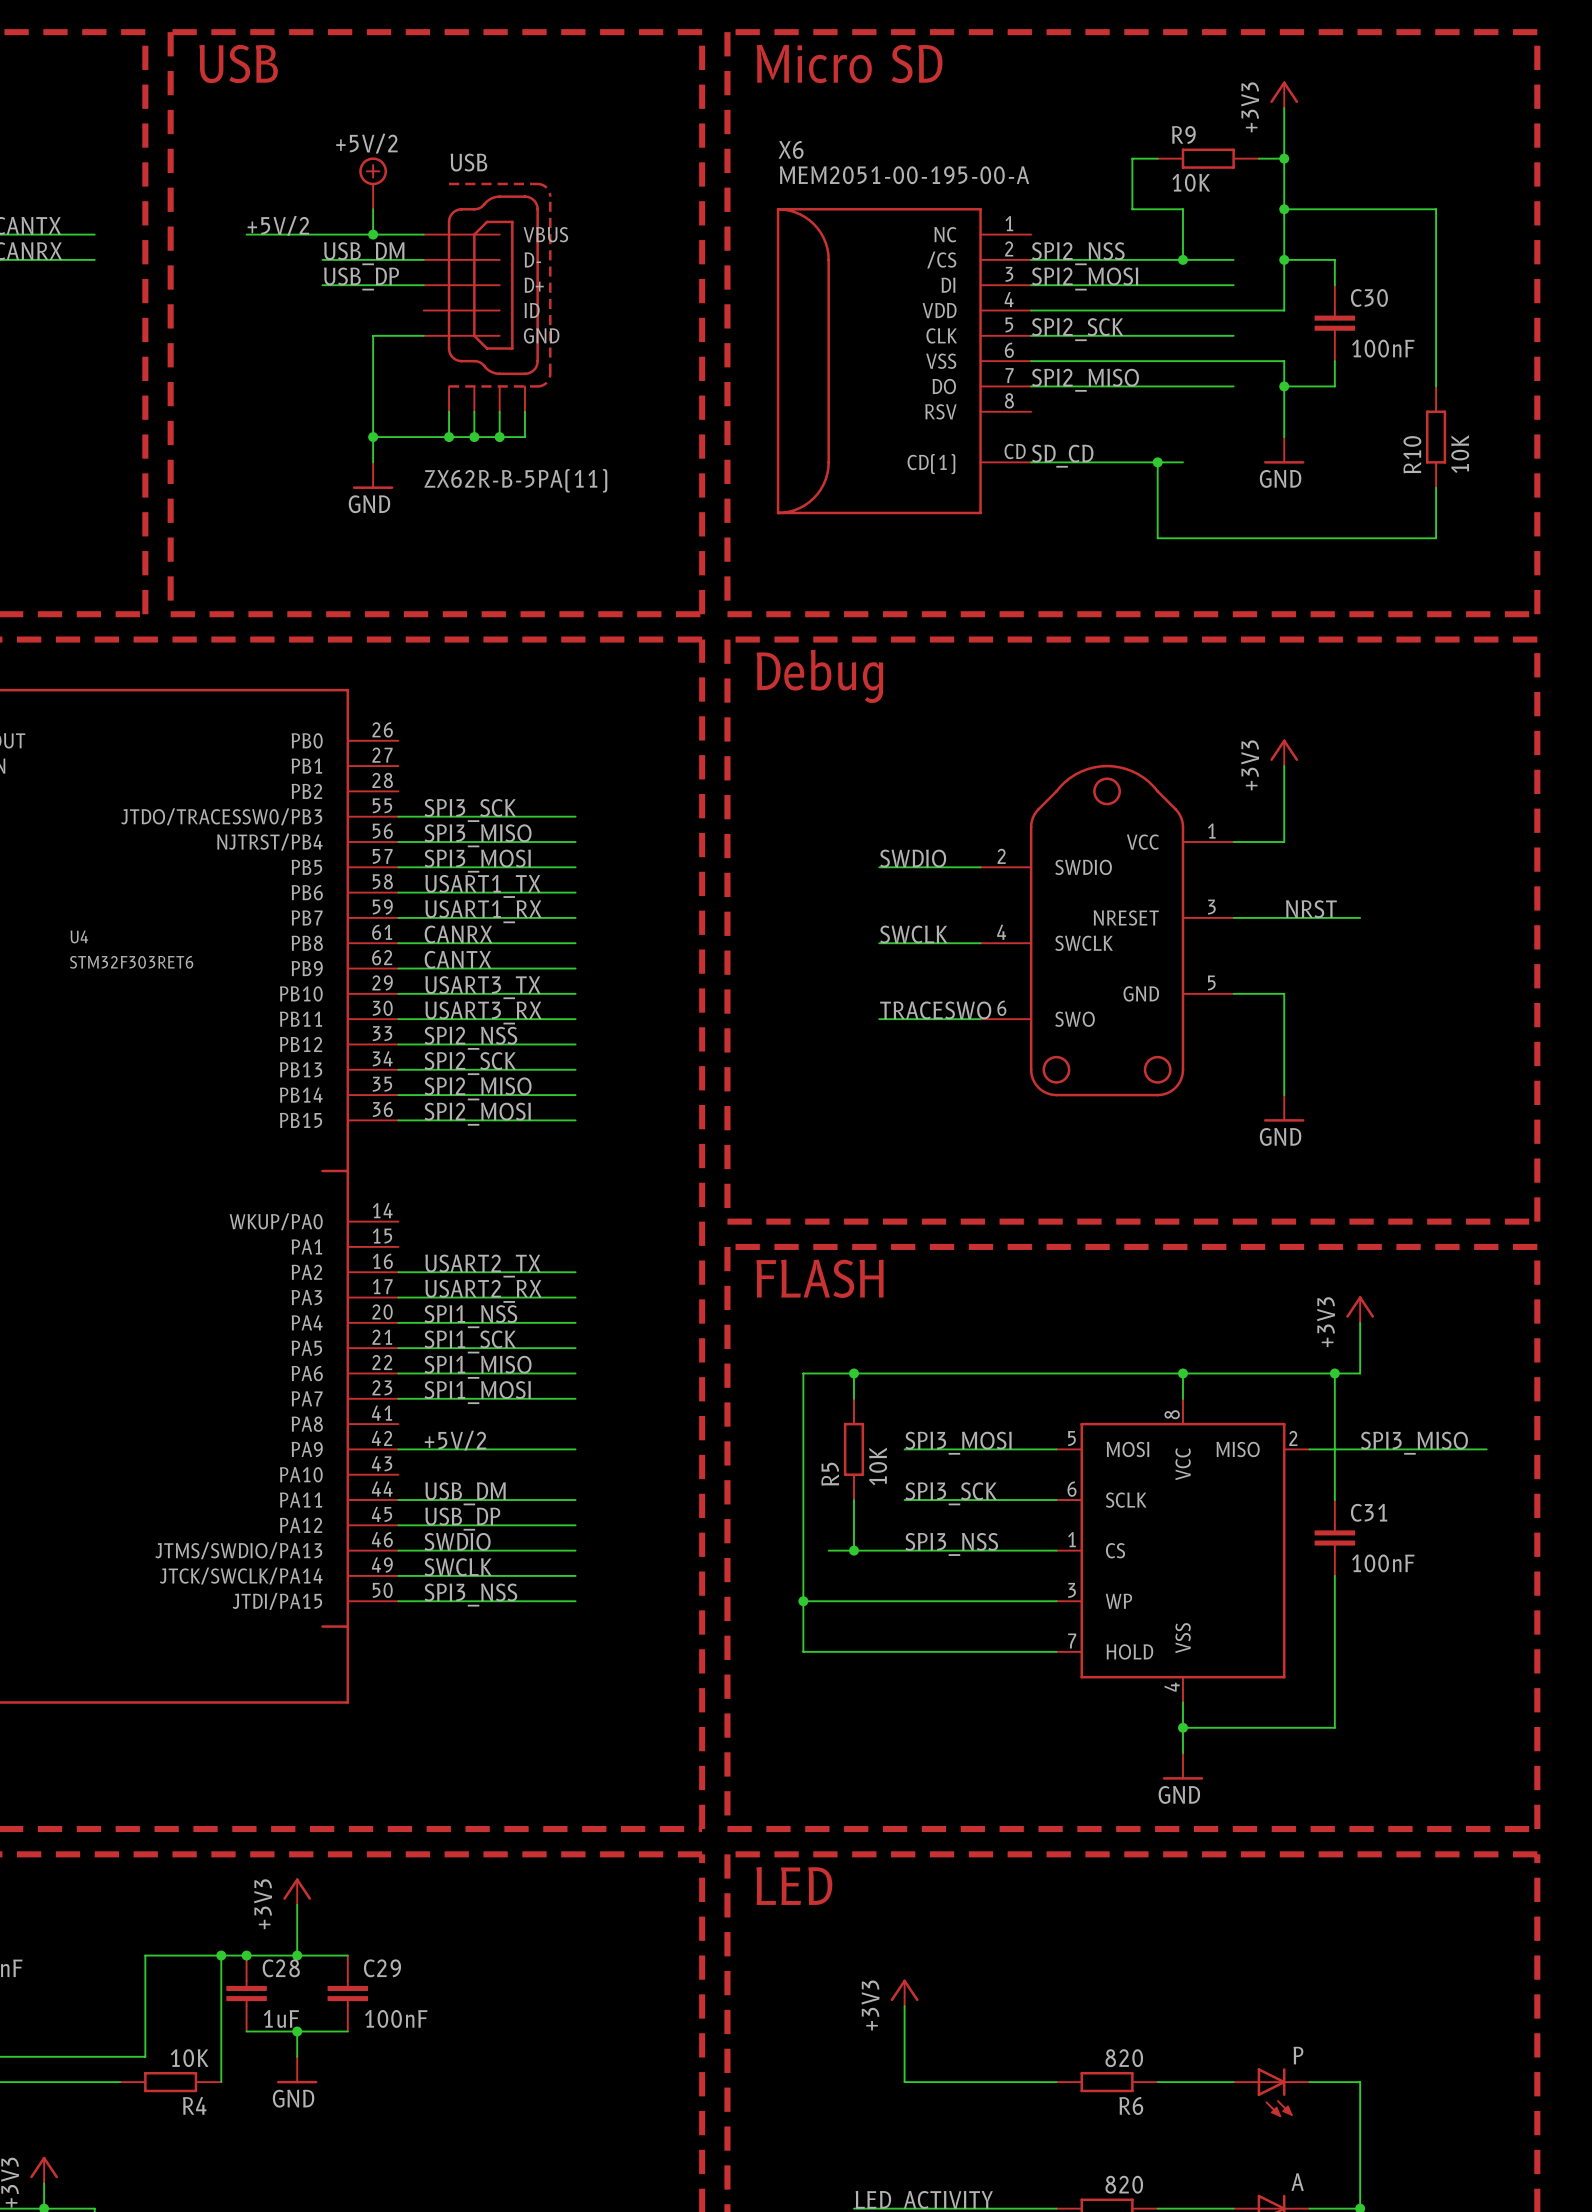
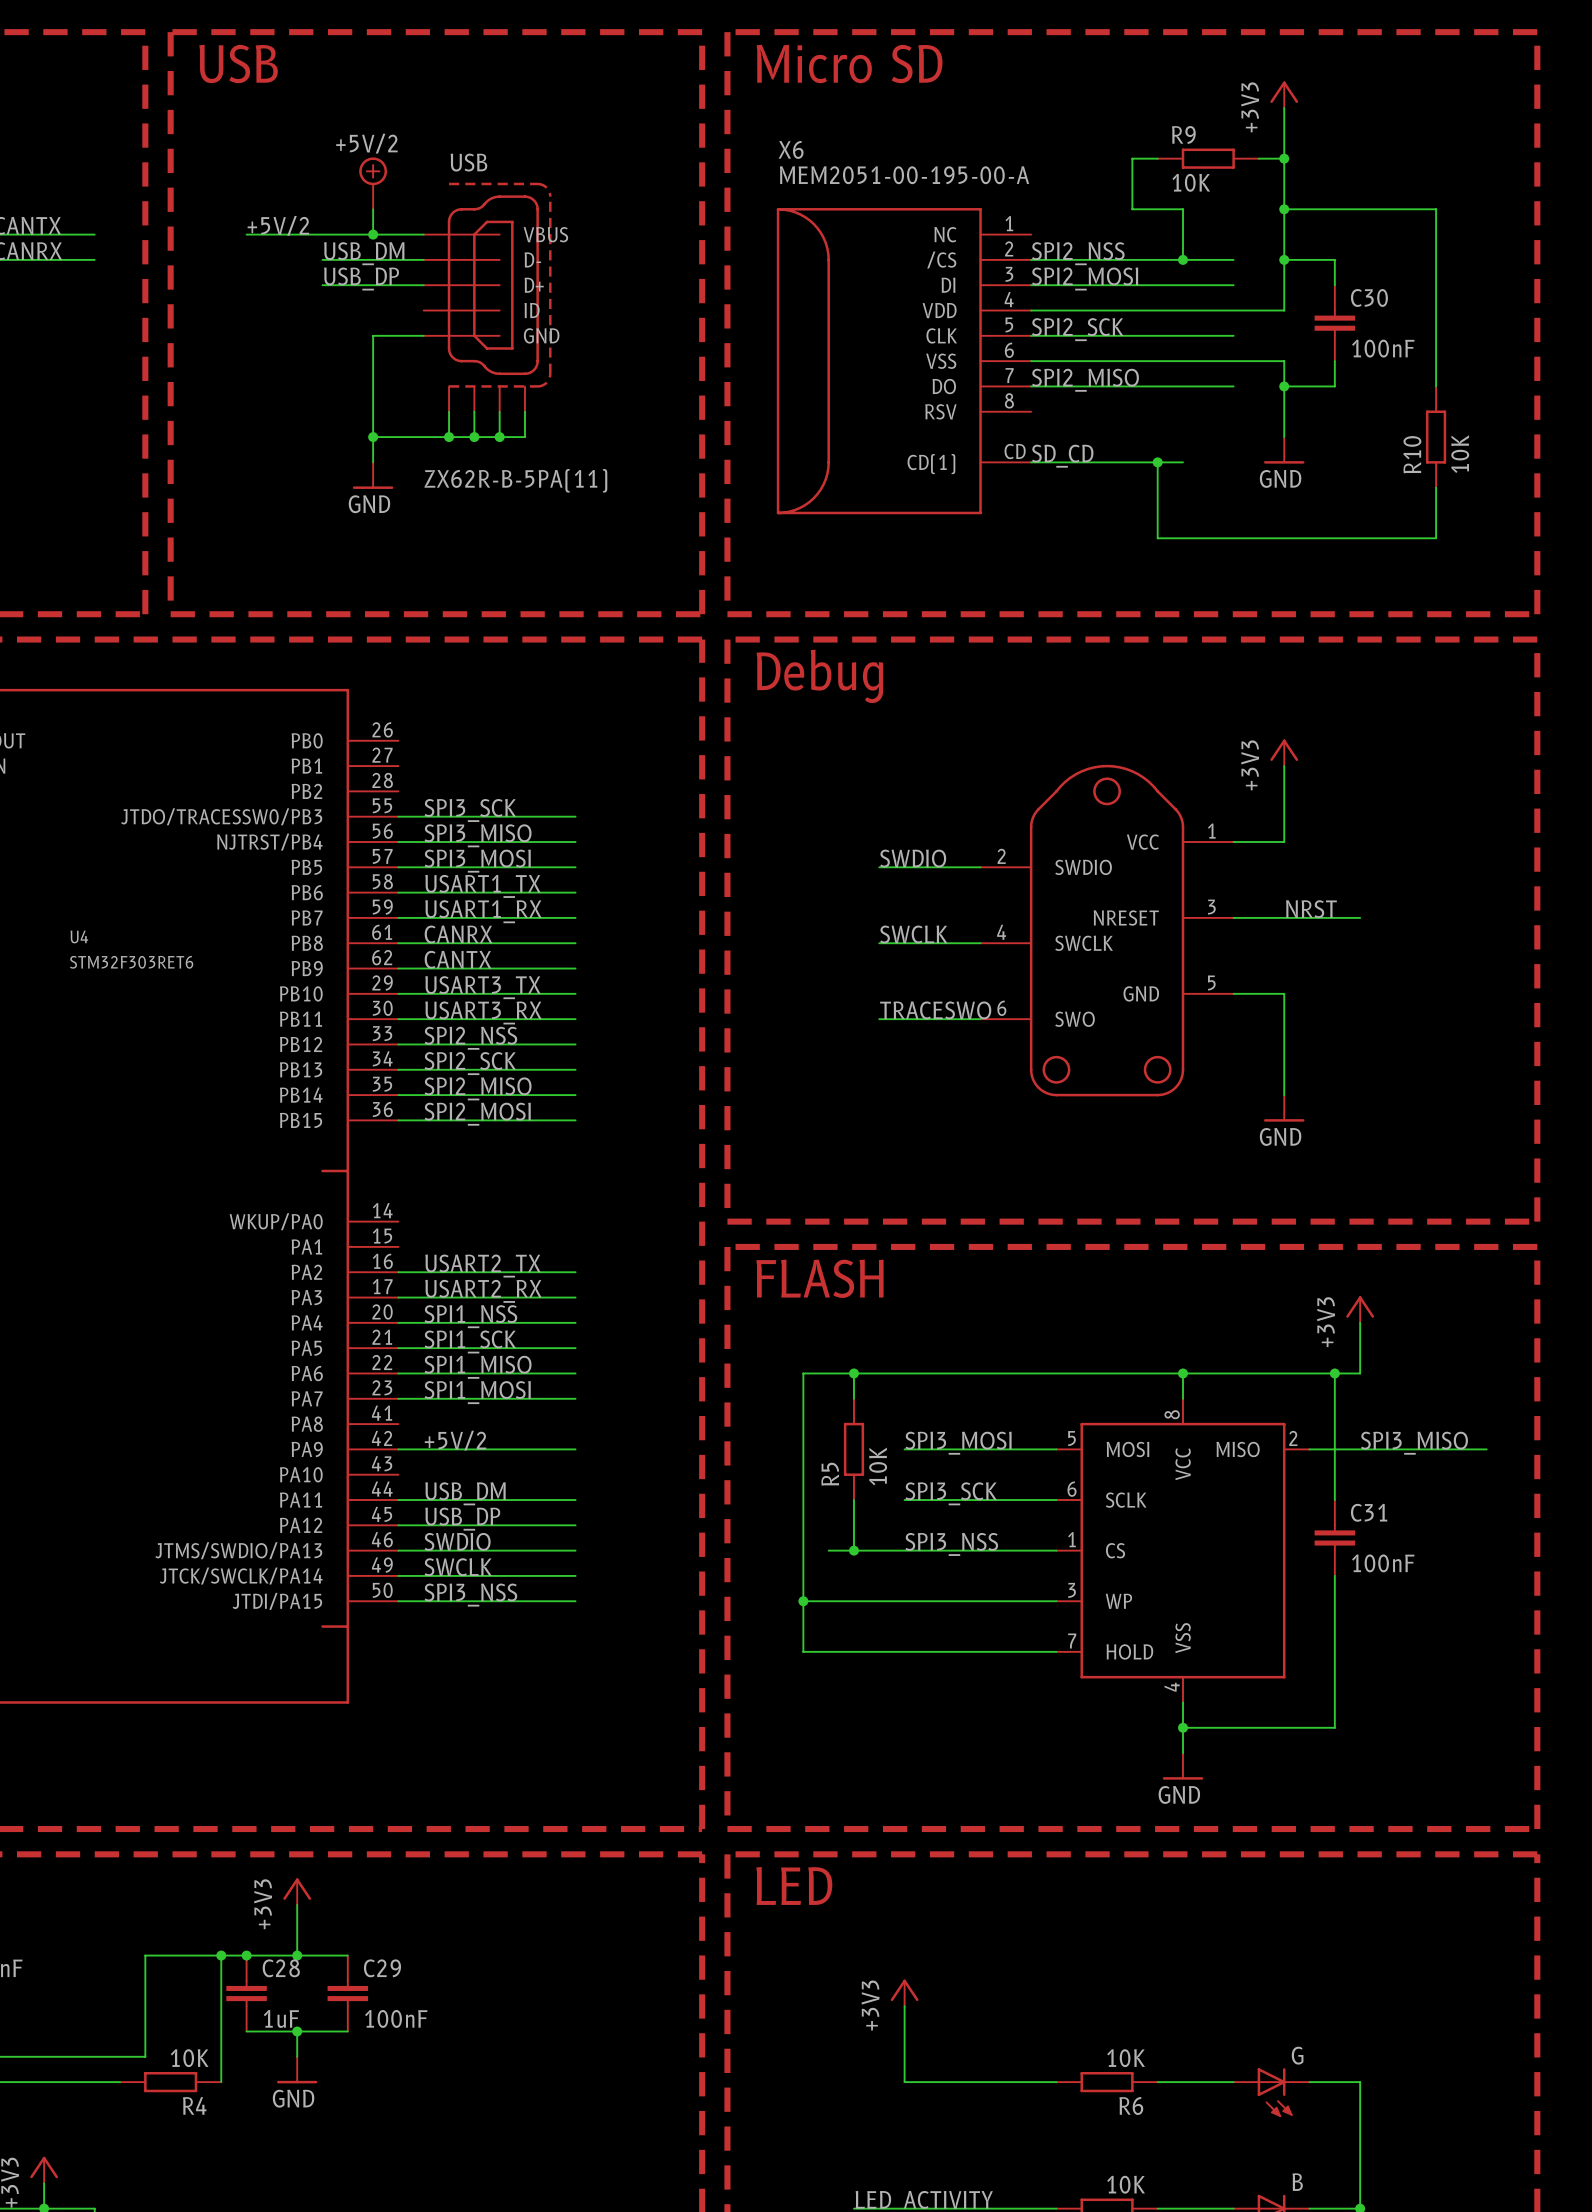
P name: P (1298, 2055) -> G (1297, 2055)
R6 value: 820 (1124, 2058) -> 10K (1126, 2058)
A name: A (1297, 2182) -> B (1297, 2182)
part value: 820 (1124, 2184) -> 10K (1126, 2184)

